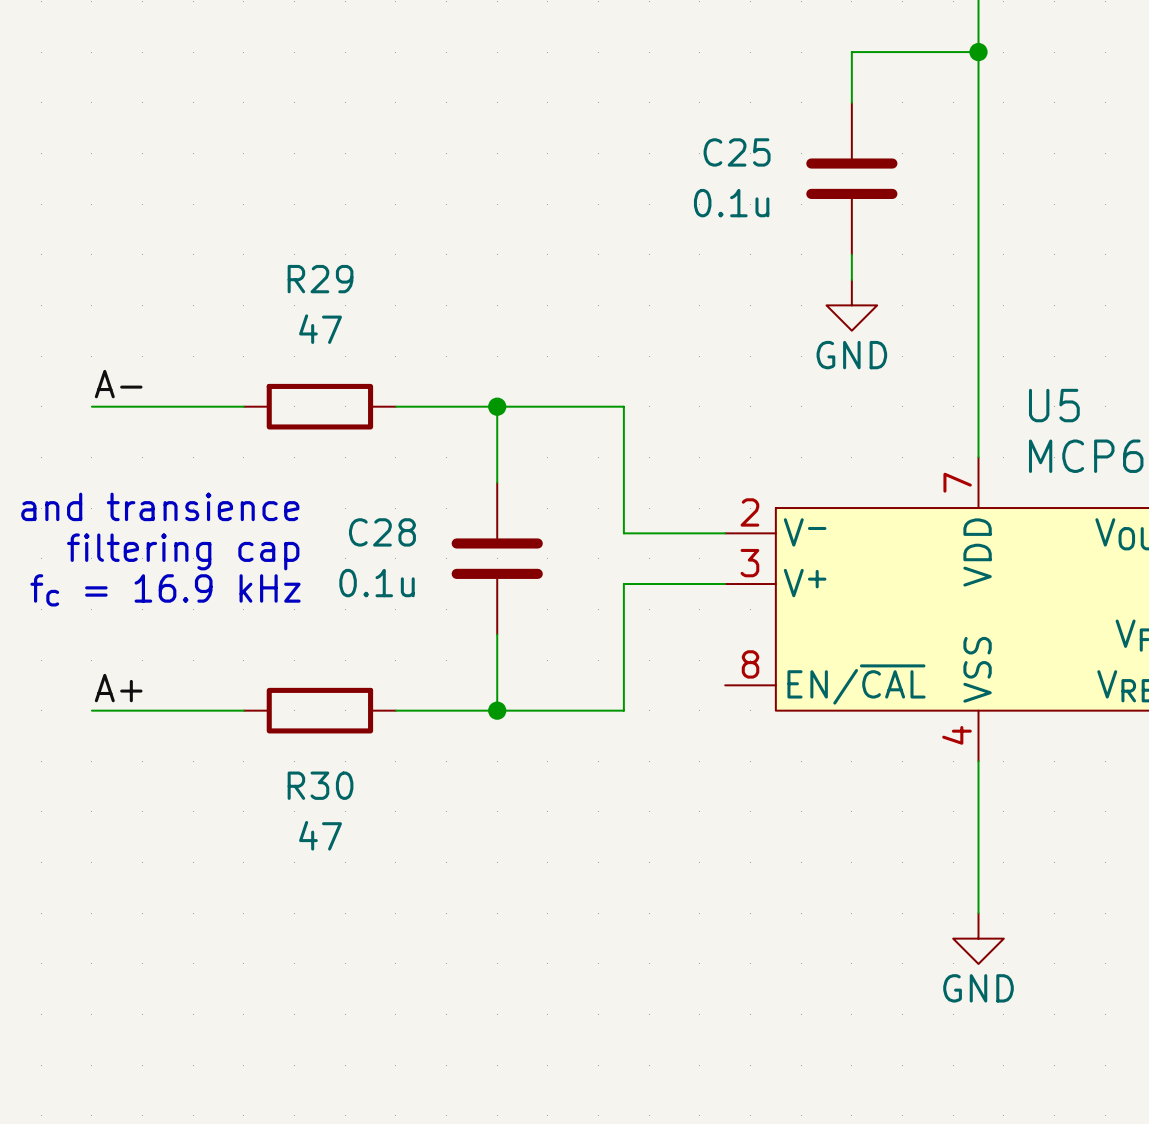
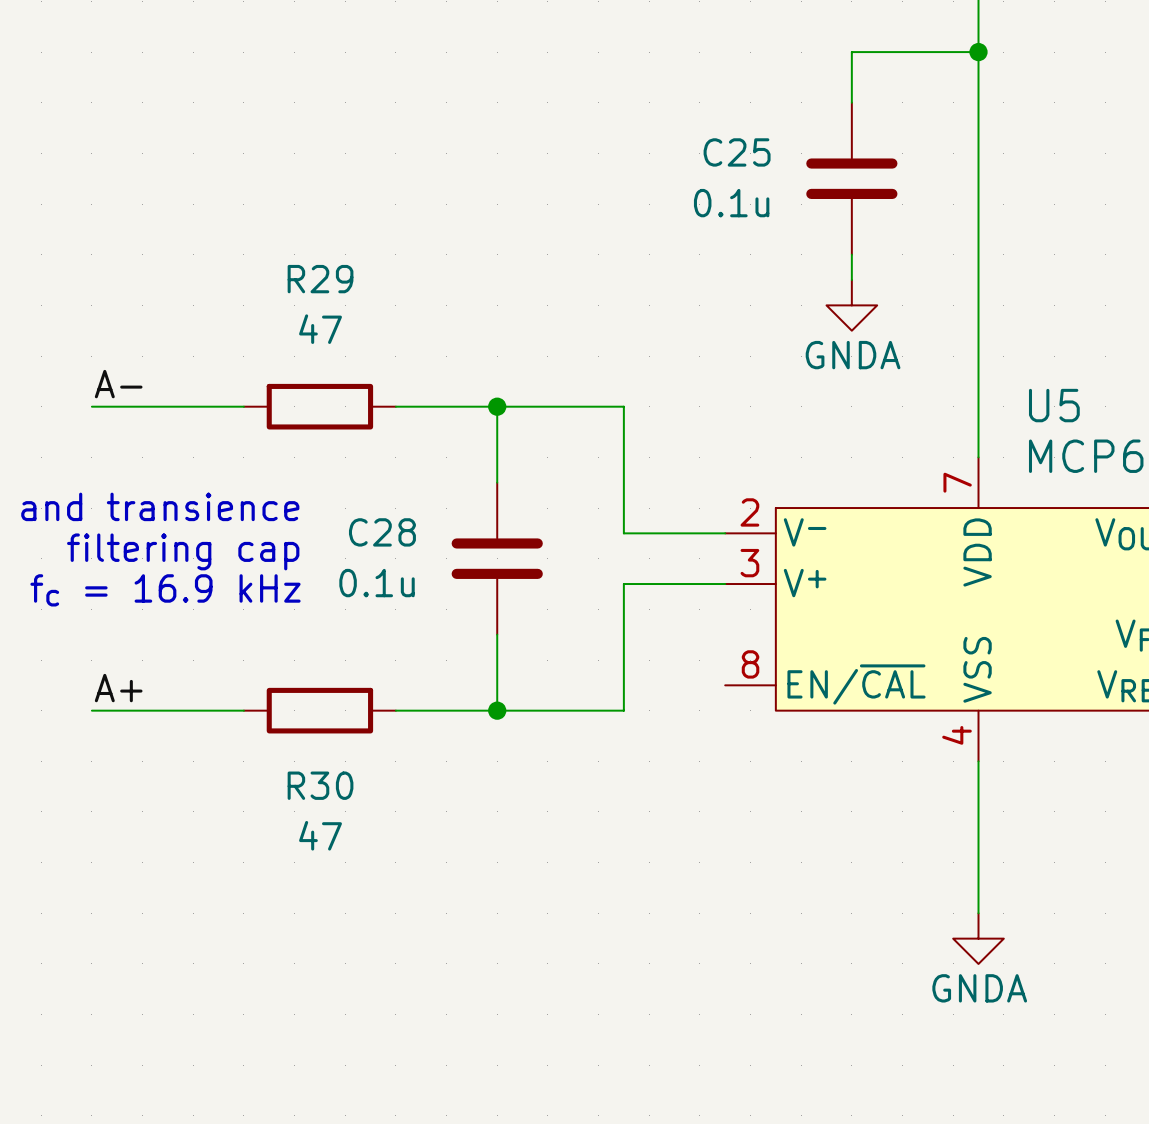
power symbol: GND (851, 305) -> GNDA (851, 305)
power symbol: GND (978, 938) -> GNDA (978, 938)

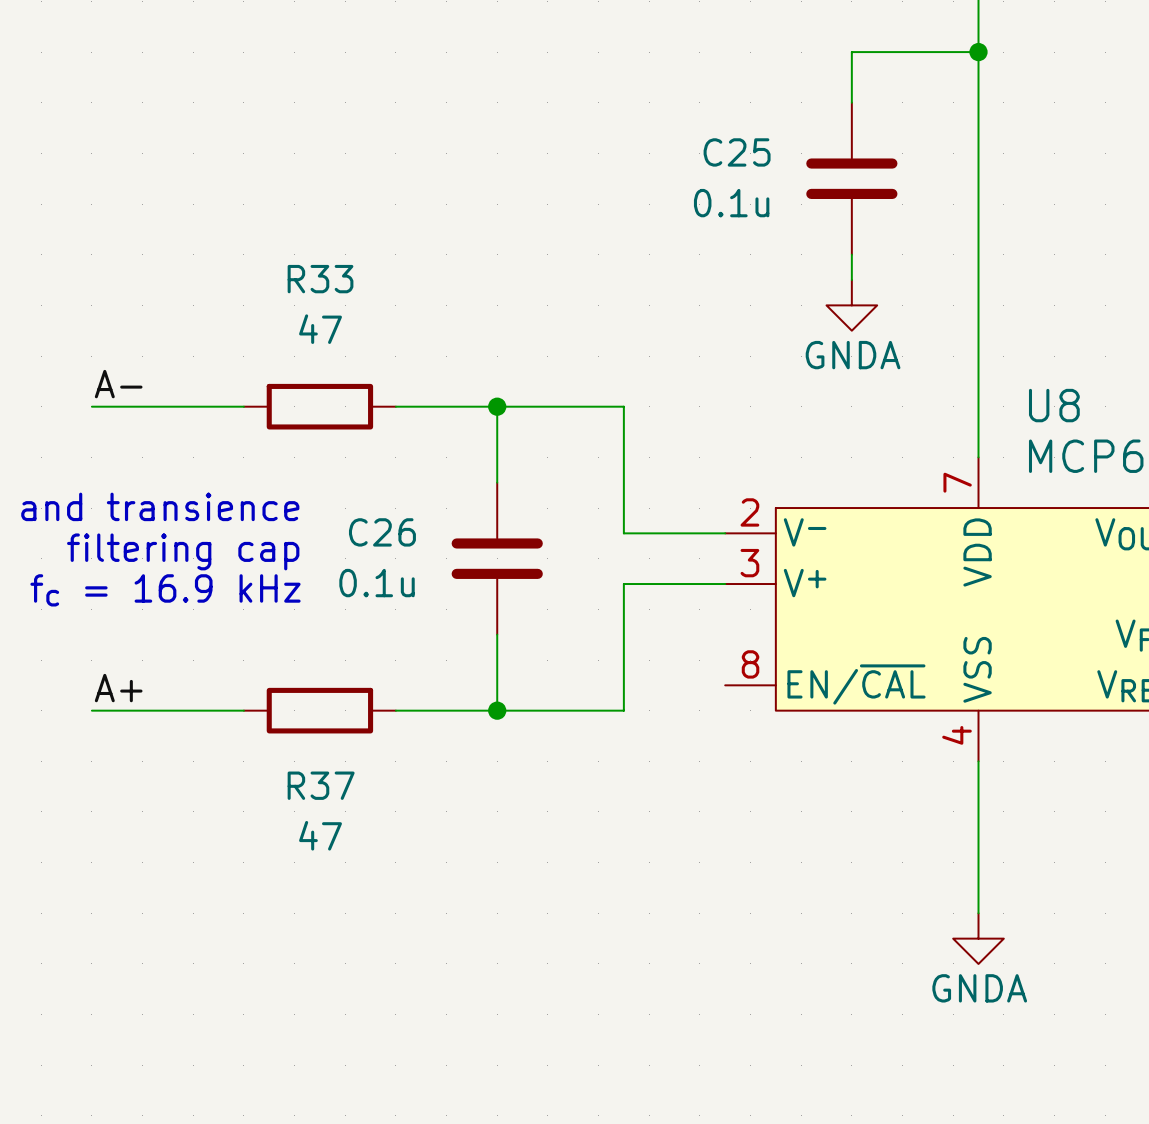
R29 name: R29 (320, 279) -> R33 (320, 279)
U5 name: U5 (1054, 405) -> U8 (1054, 405)
C28 name: C28 (382, 532) -> C26 (382, 532)
R30 name: R30 (320, 785) -> R37 (321, 785)

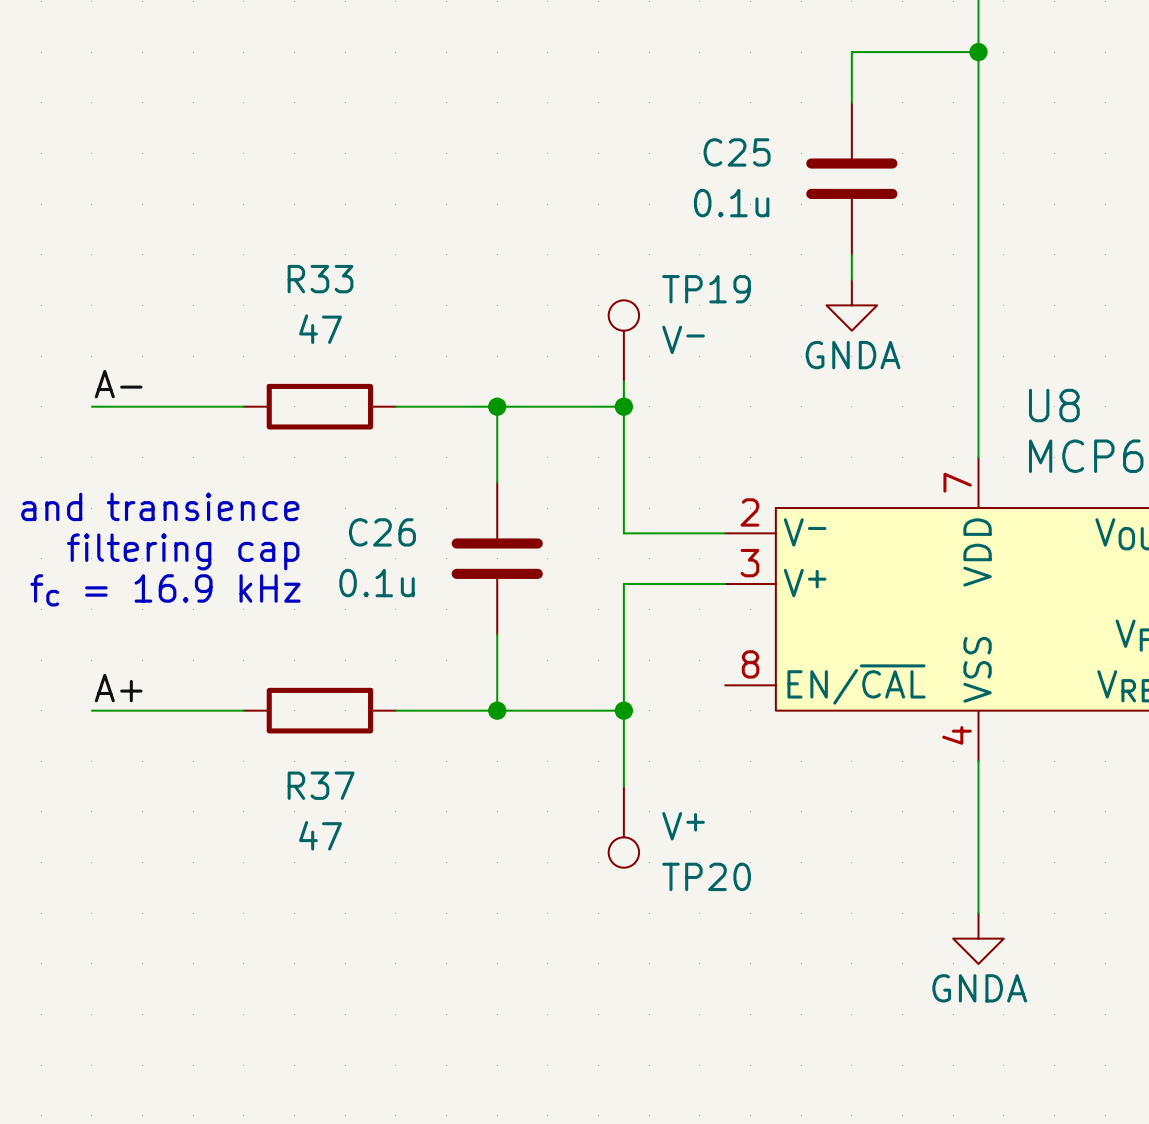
TP19: none -> V- (623, 340)
wire: none -> (623, 381) (623, 406)
junction: none -> (623, 406)
wire: none -> (623, 710) (623, 786)
junction: none -> (623, 710)
TP20: none -> V+ (623, 827)

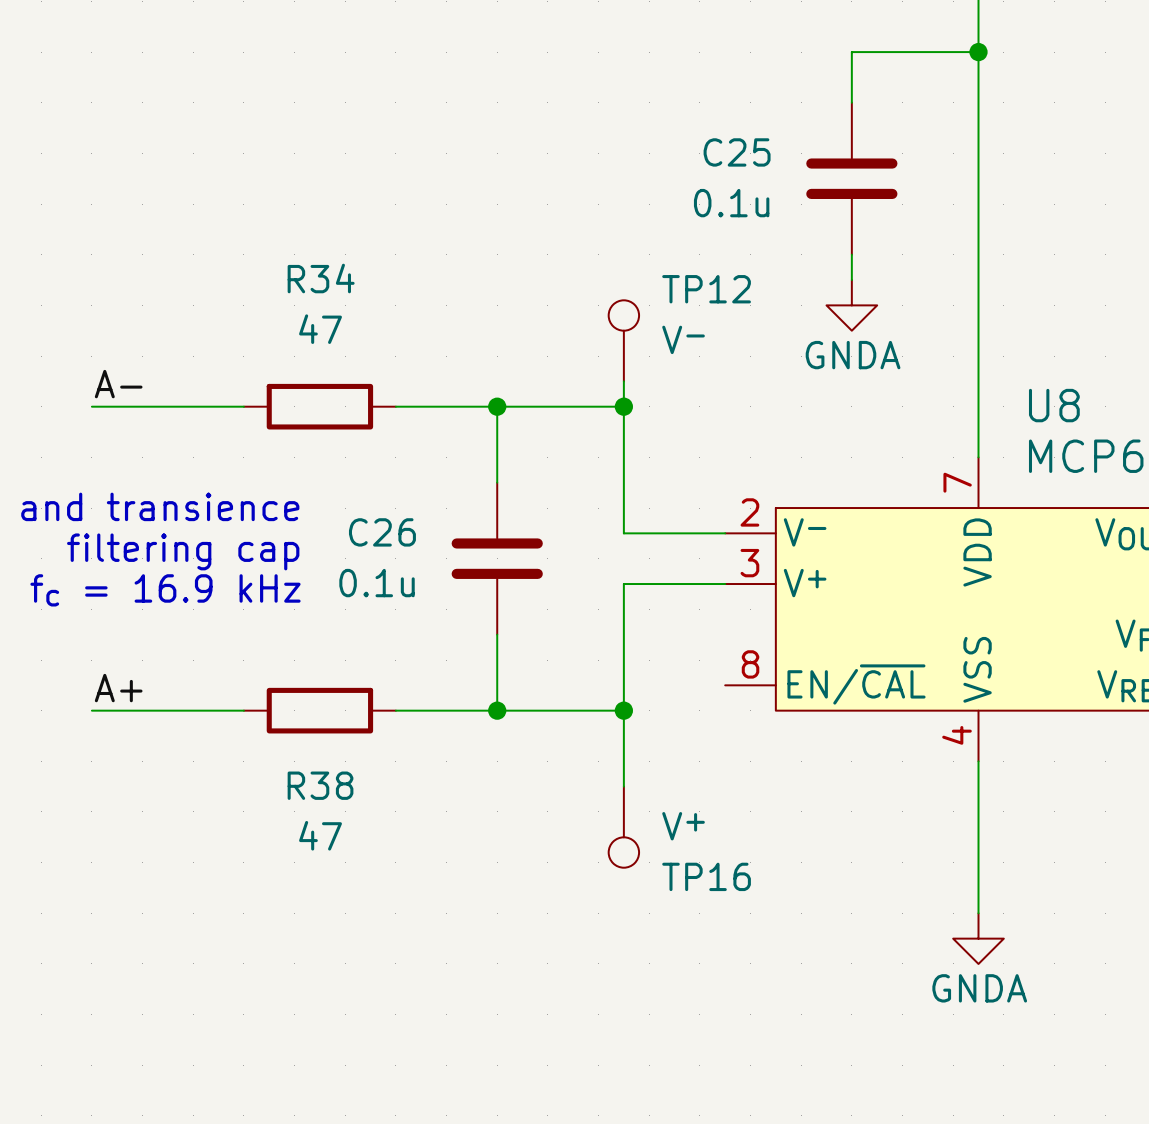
R33 name: R33 (320, 279) -> R34 (321, 278)
TP19 name: TP19 (706, 289) -> TP12 (706, 289)
R37 name: R37 (321, 785) -> R38 (320, 785)
TP20 name: TP20 (706, 876) -> TP16 (706, 876)

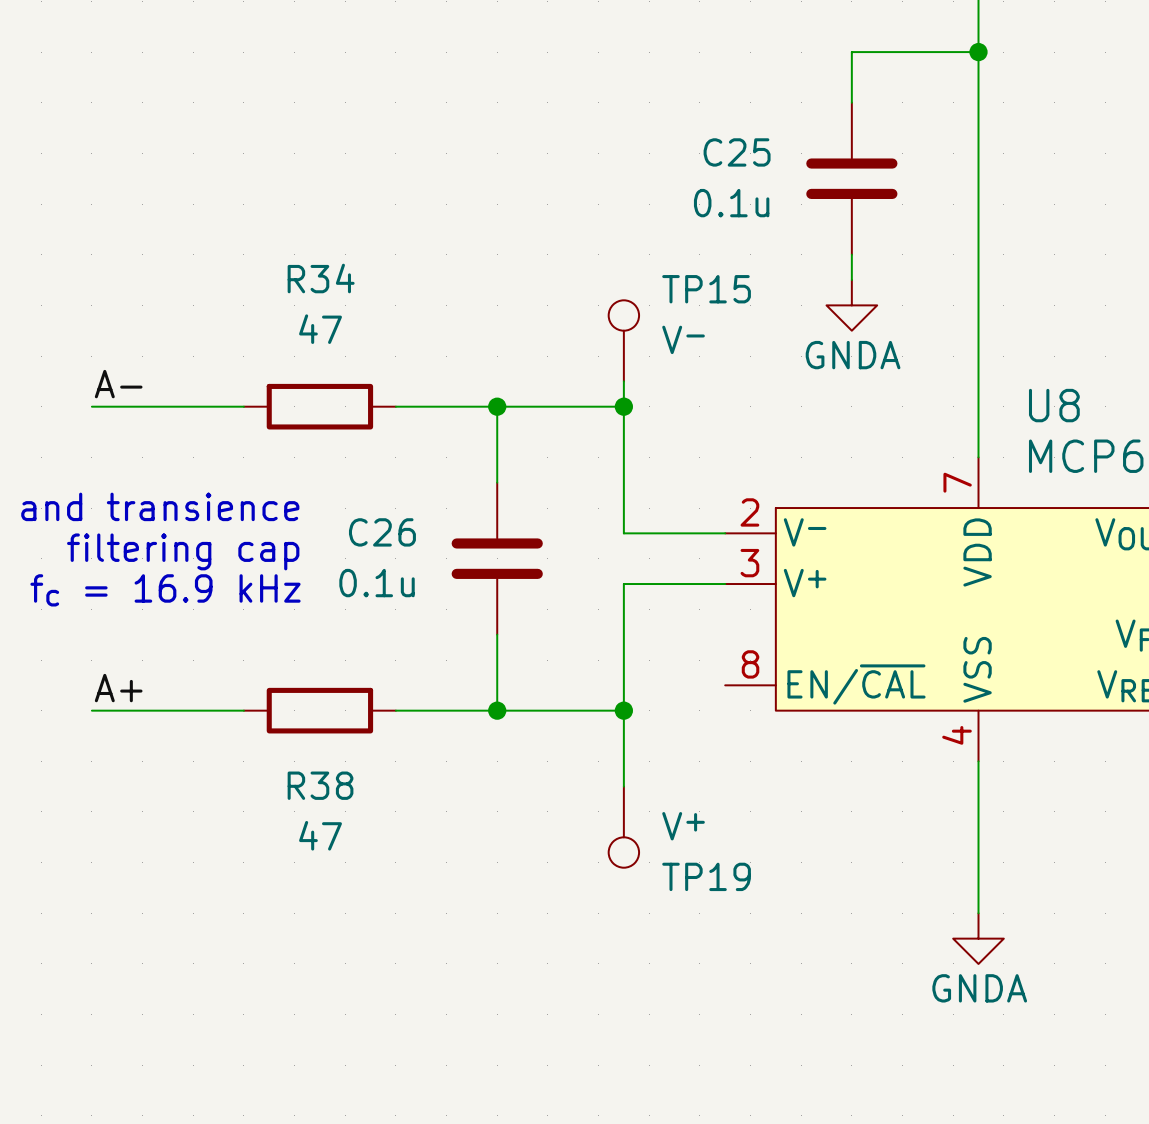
TP12 name: TP12 (706, 289) -> TP15 (706, 289)
TP16 name: TP16 (706, 876) -> TP19 (706, 876)

